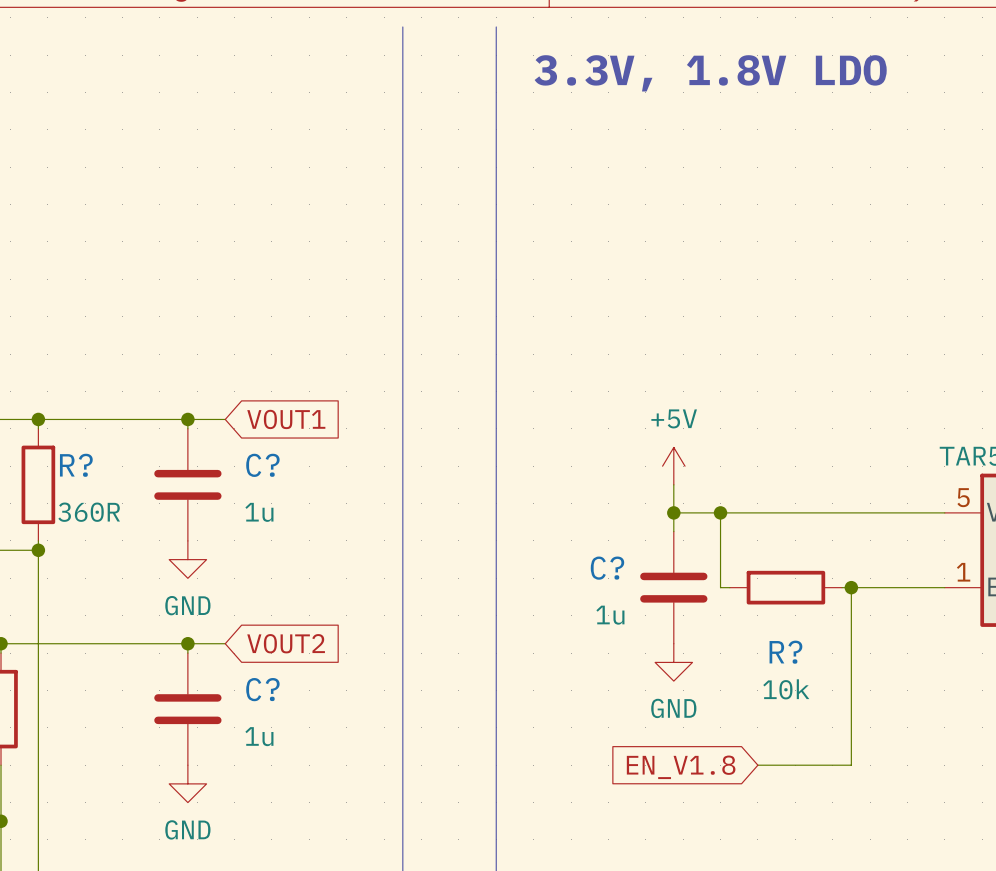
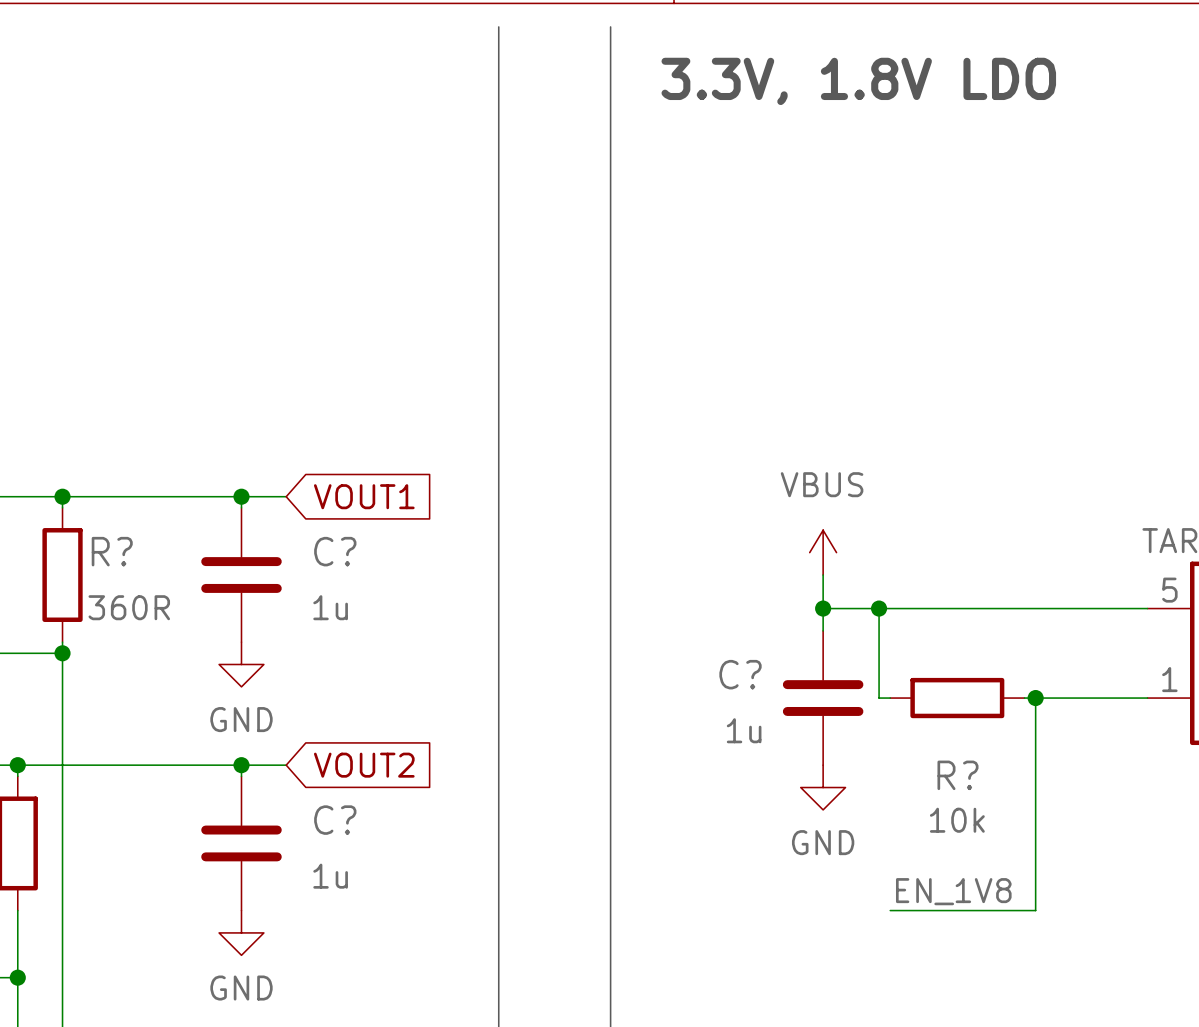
power symbol: +5V (673, 466) -> VBUS (823, 552)
label: none -> EN_1V8 (953, 891)
wire: none -> (890, 910) (923, 910)
global label: EN_V1.8 (681, 767) -> none

